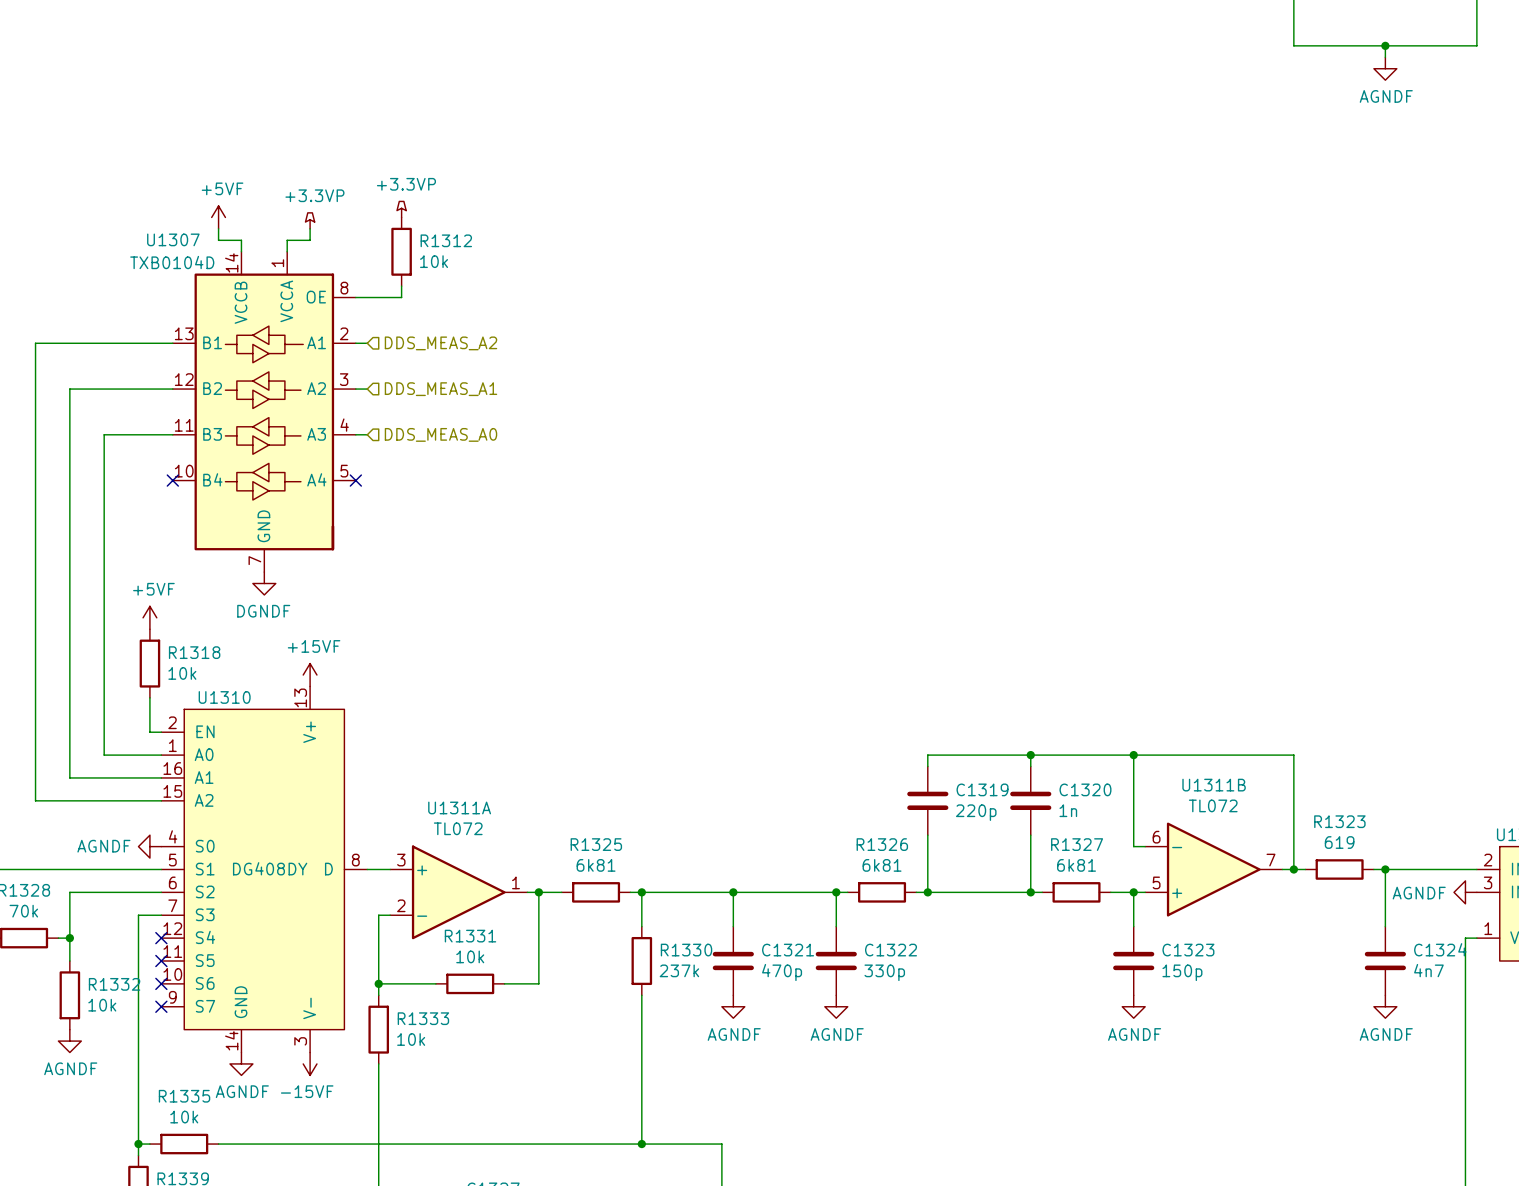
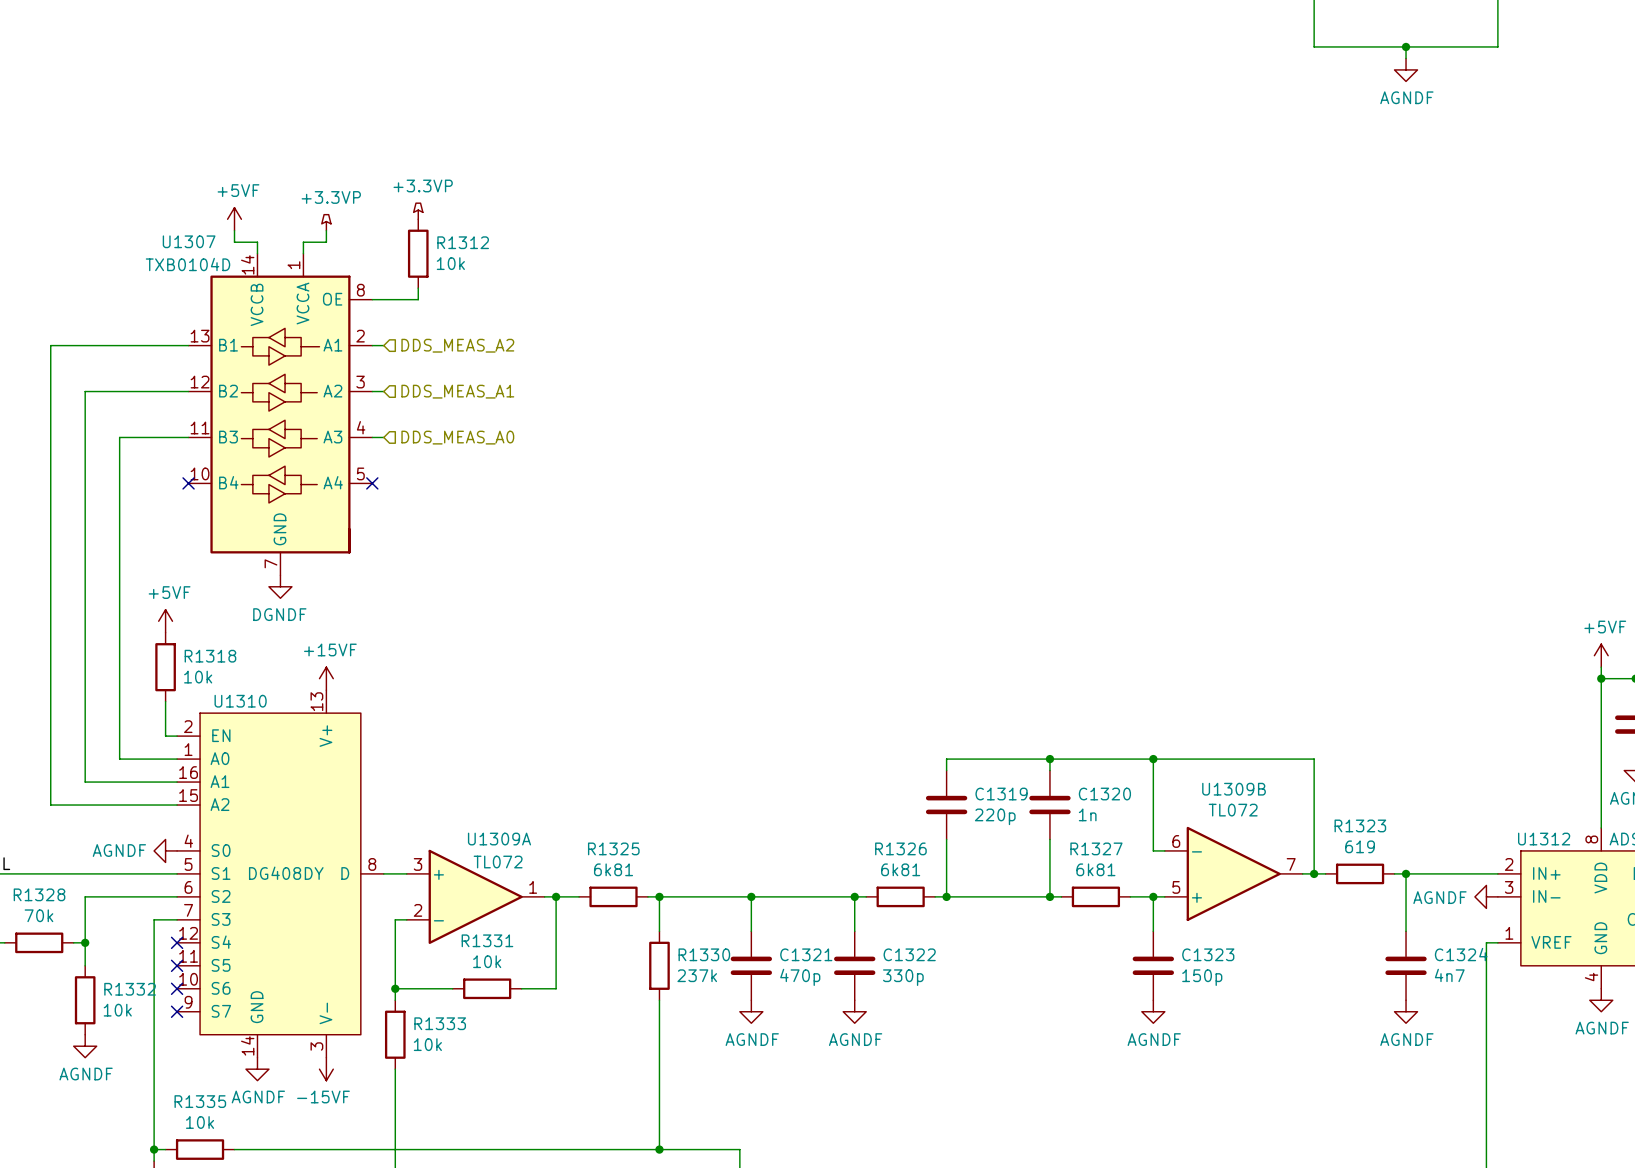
U1311B name: U1311B (1214, 785) -> U1309B (1234, 789)
U1311A name: U1311A (459, 807) -> U1309A (499, 839)
U1311A value position: TL072 (458, 828) -> TL072 (498, 862)

